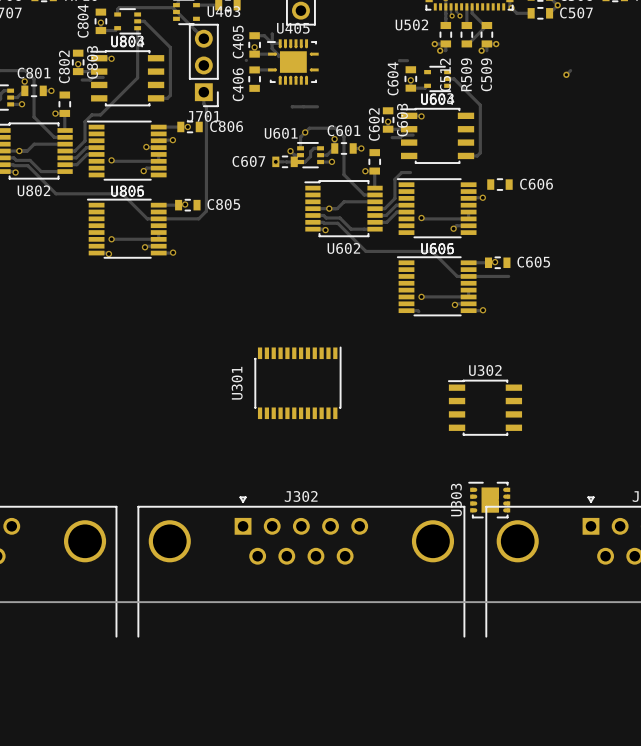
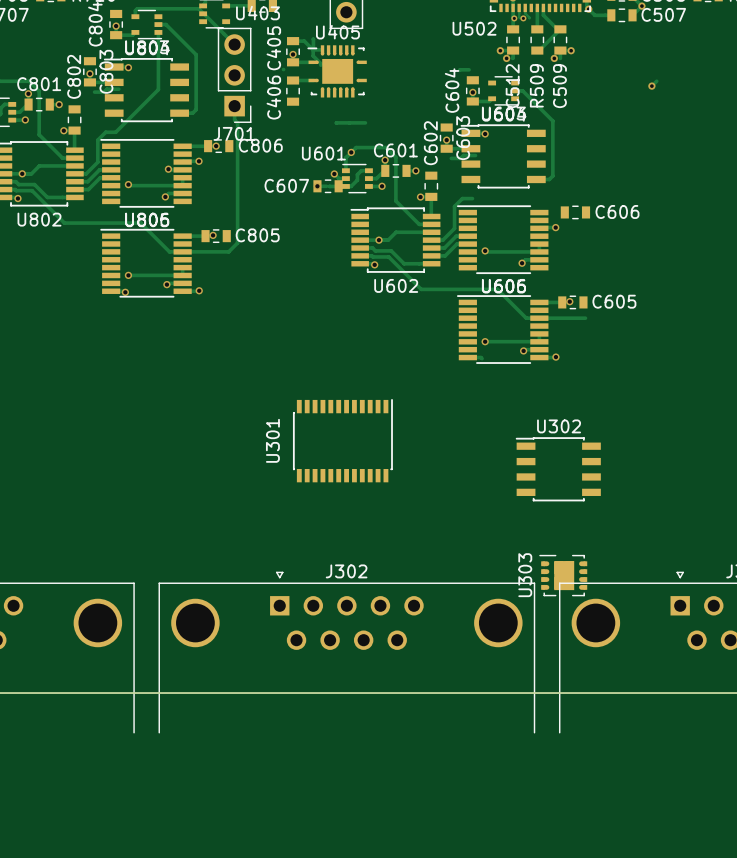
via: none -> (514, 18)
via: (452, 15) -> none
via: none -> (523, 18)
via: (460, 15) -> none

